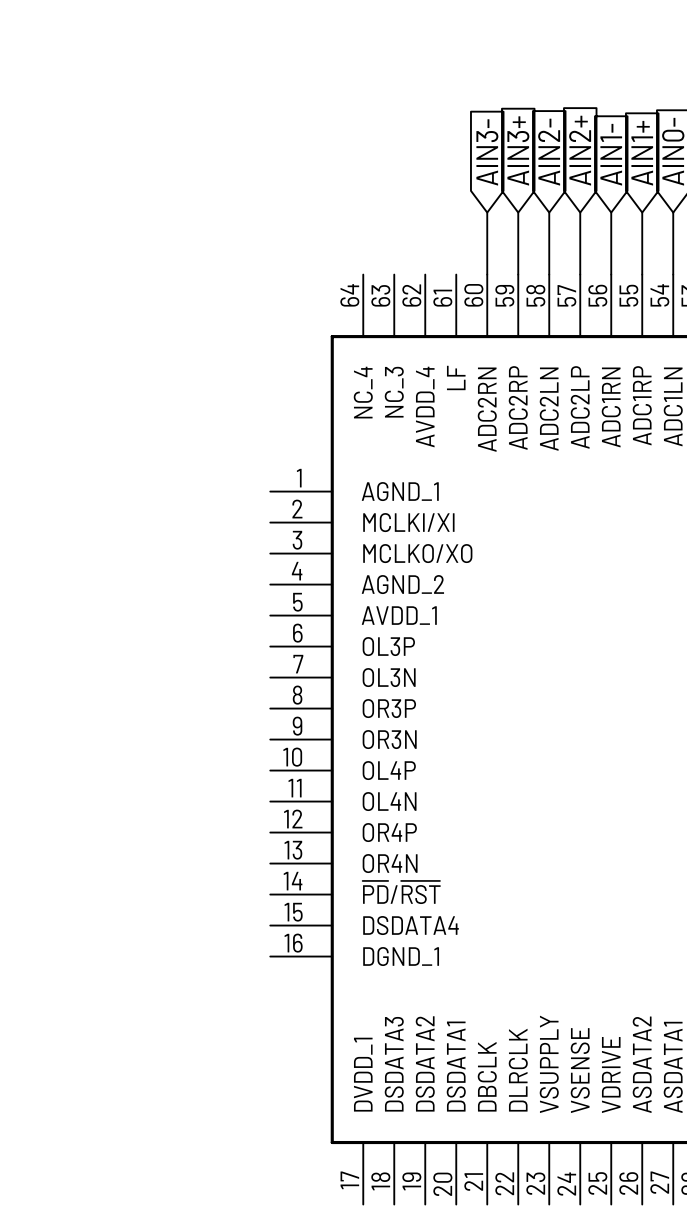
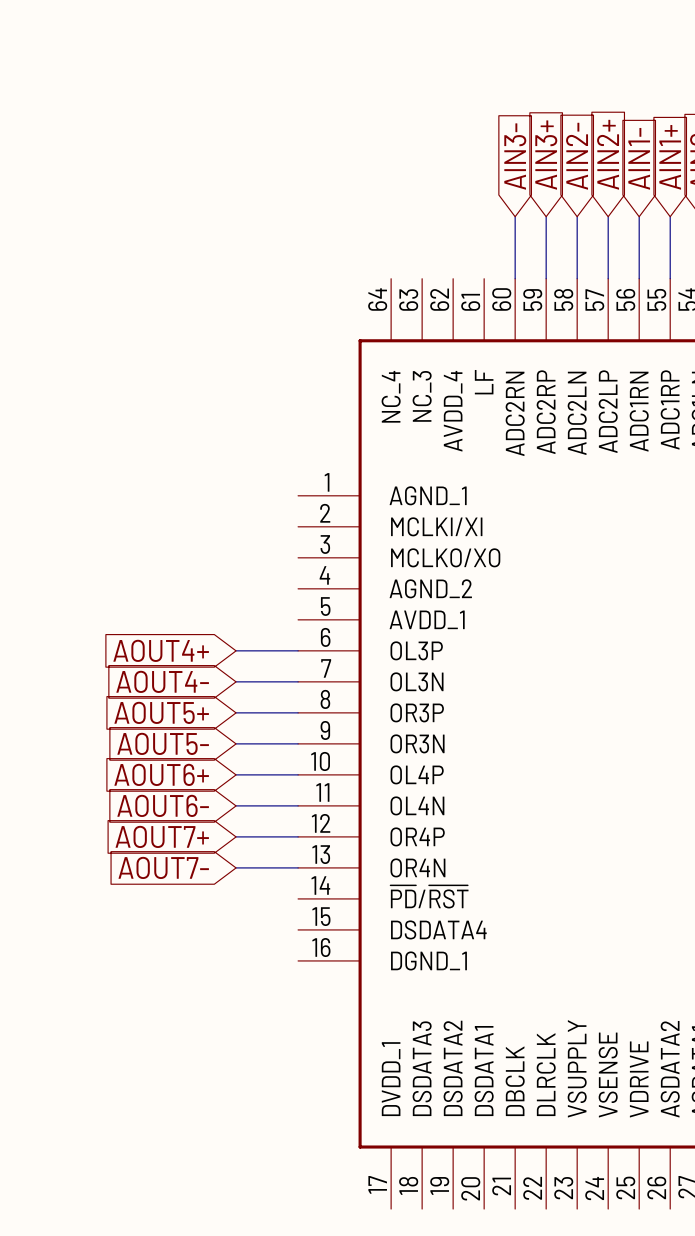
global label: none -> AOUT4+ (161, 650)
wire: none -> (236, 650) (298, 650)
global label: none -> AOUT4- (162, 681)
wire: none -> (236, 681) (298, 681)
global label: none -> AOUT5+ (161, 712)
wire: none -> (236, 712) (298, 712)
global label: none -> AOUT5- (163, 743)
wire: none -> (236, 743) (298, 743)
global label: none -> AOUT6+ (161, 774)
wire: none -> (236, 774) (298, 774)
global label: none -> AOUT6- (163, 805)
wire: none -> (236, 805) (298, 805)
global label: none -> AOUT7+ (162, 836)
wire: none -> (236, 836) (298, 836)
global label: none -> AOUT7- (163, 867)
wire: none -> (236, 867) (298, 867)

